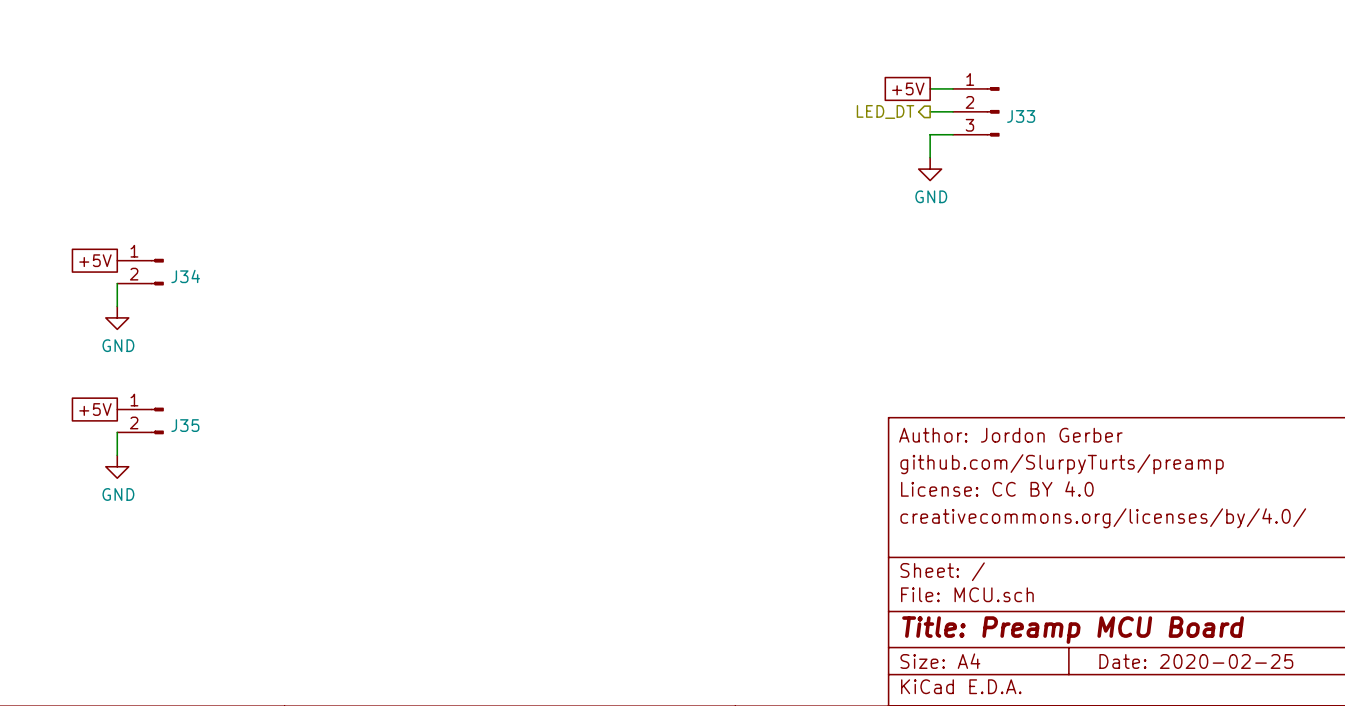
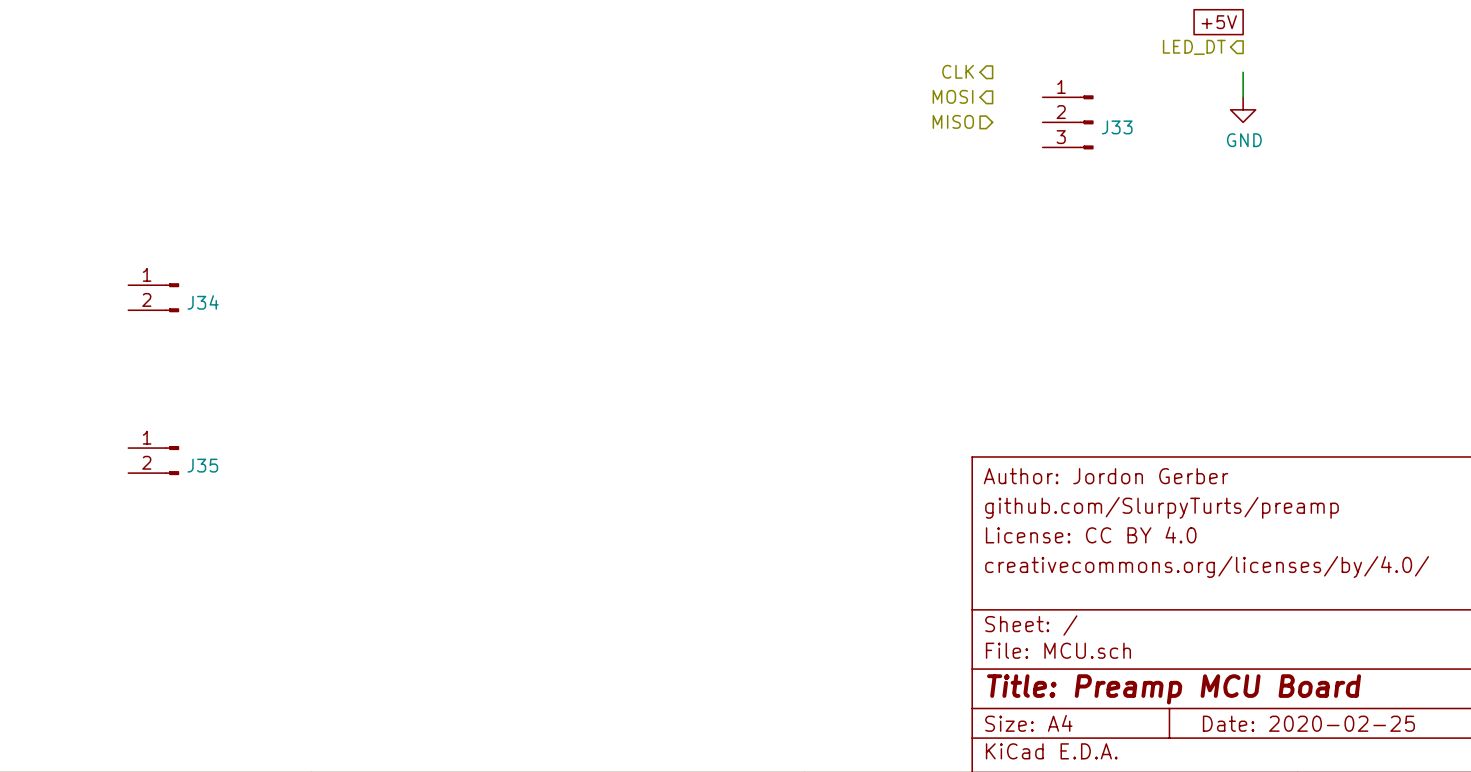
global label: none -> +5V (1219, 22)
hierarchical label: none -> CLK (958, 71)
wire: none -> (1243, 72) (1243, 97)
hierarchical label: none -> MOSI (953, 96)
global label: +5V (908, 88) -> none
wire: (930, 88) (953, 88) -> none
power symbol: none -> GND (1243, 109)
hierarchical label: none -> MISO (953, 121)
hierarchical label position: LED_DT (885, 111) -> LED_DT (1194, 47)
wire: (930, 111) (953, 111) -> none
wire: (953, 134) (930, 134) (930, 157) -> none
power symbol: GND (930, 169) -> none
global label: +5V (95, 260) -> none
wire: (117, 283) (117, 306) -> none
power symbol: GND (117, 317) -> none
global label: +5V (95, 409) -> none
wire: (117, 432) (117, 455) -> none
power symbol: GND (117, 466) -> none

